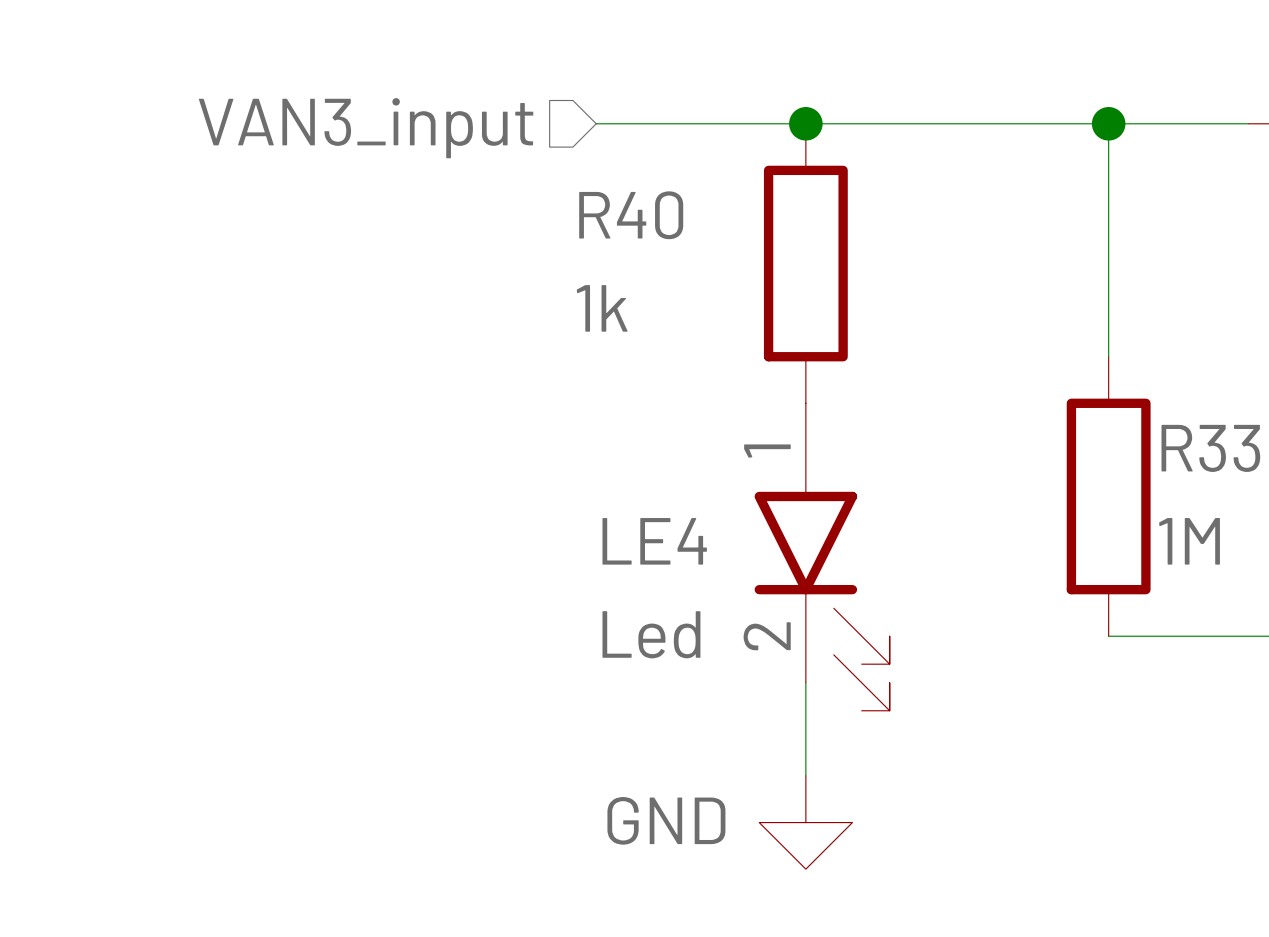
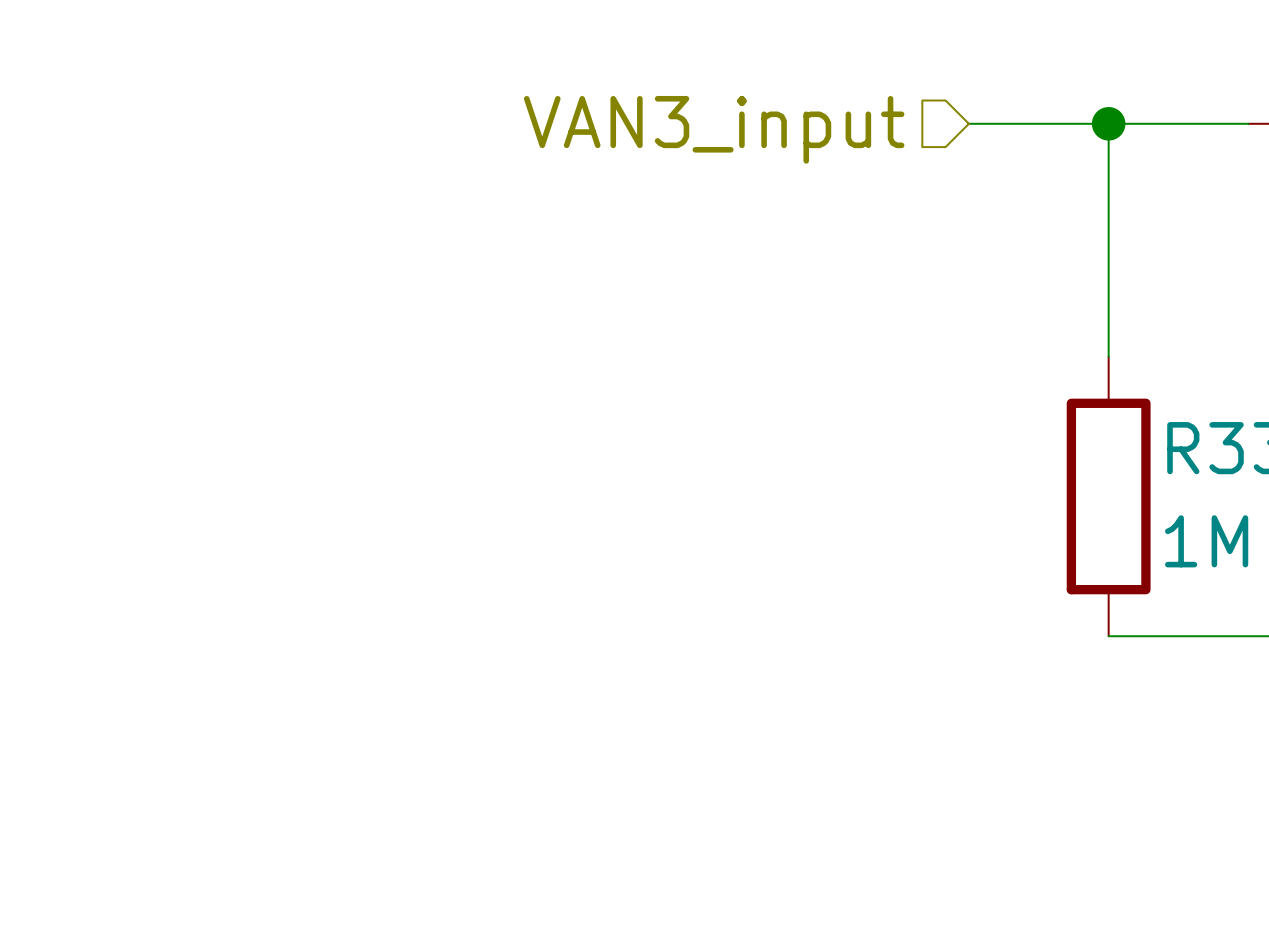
wire: (596, 123) (968, 123) -> none
junction: (805, 123) -> none
hierarchical label position: VAN3_input (366, 128) -> VAN3_input (714, 129)
R40: 1k (805, 263) -> none
LE4: Led (822, 557) -> none
wire: (805, 682) (805, 775) -> none
power symbol: GND (805, 822) -> none

